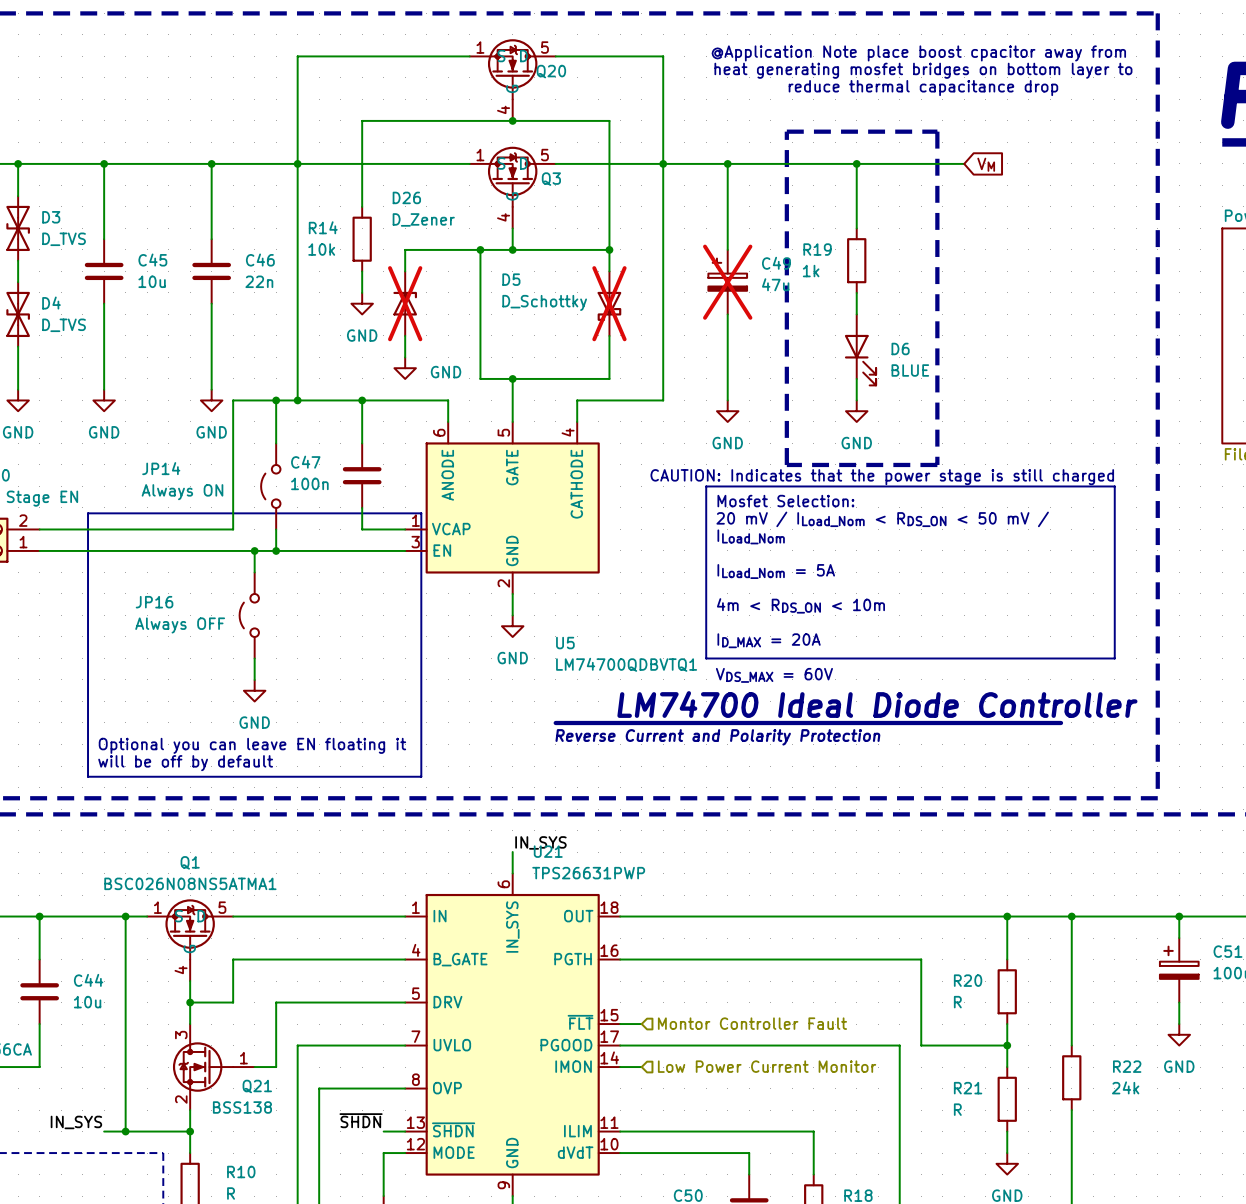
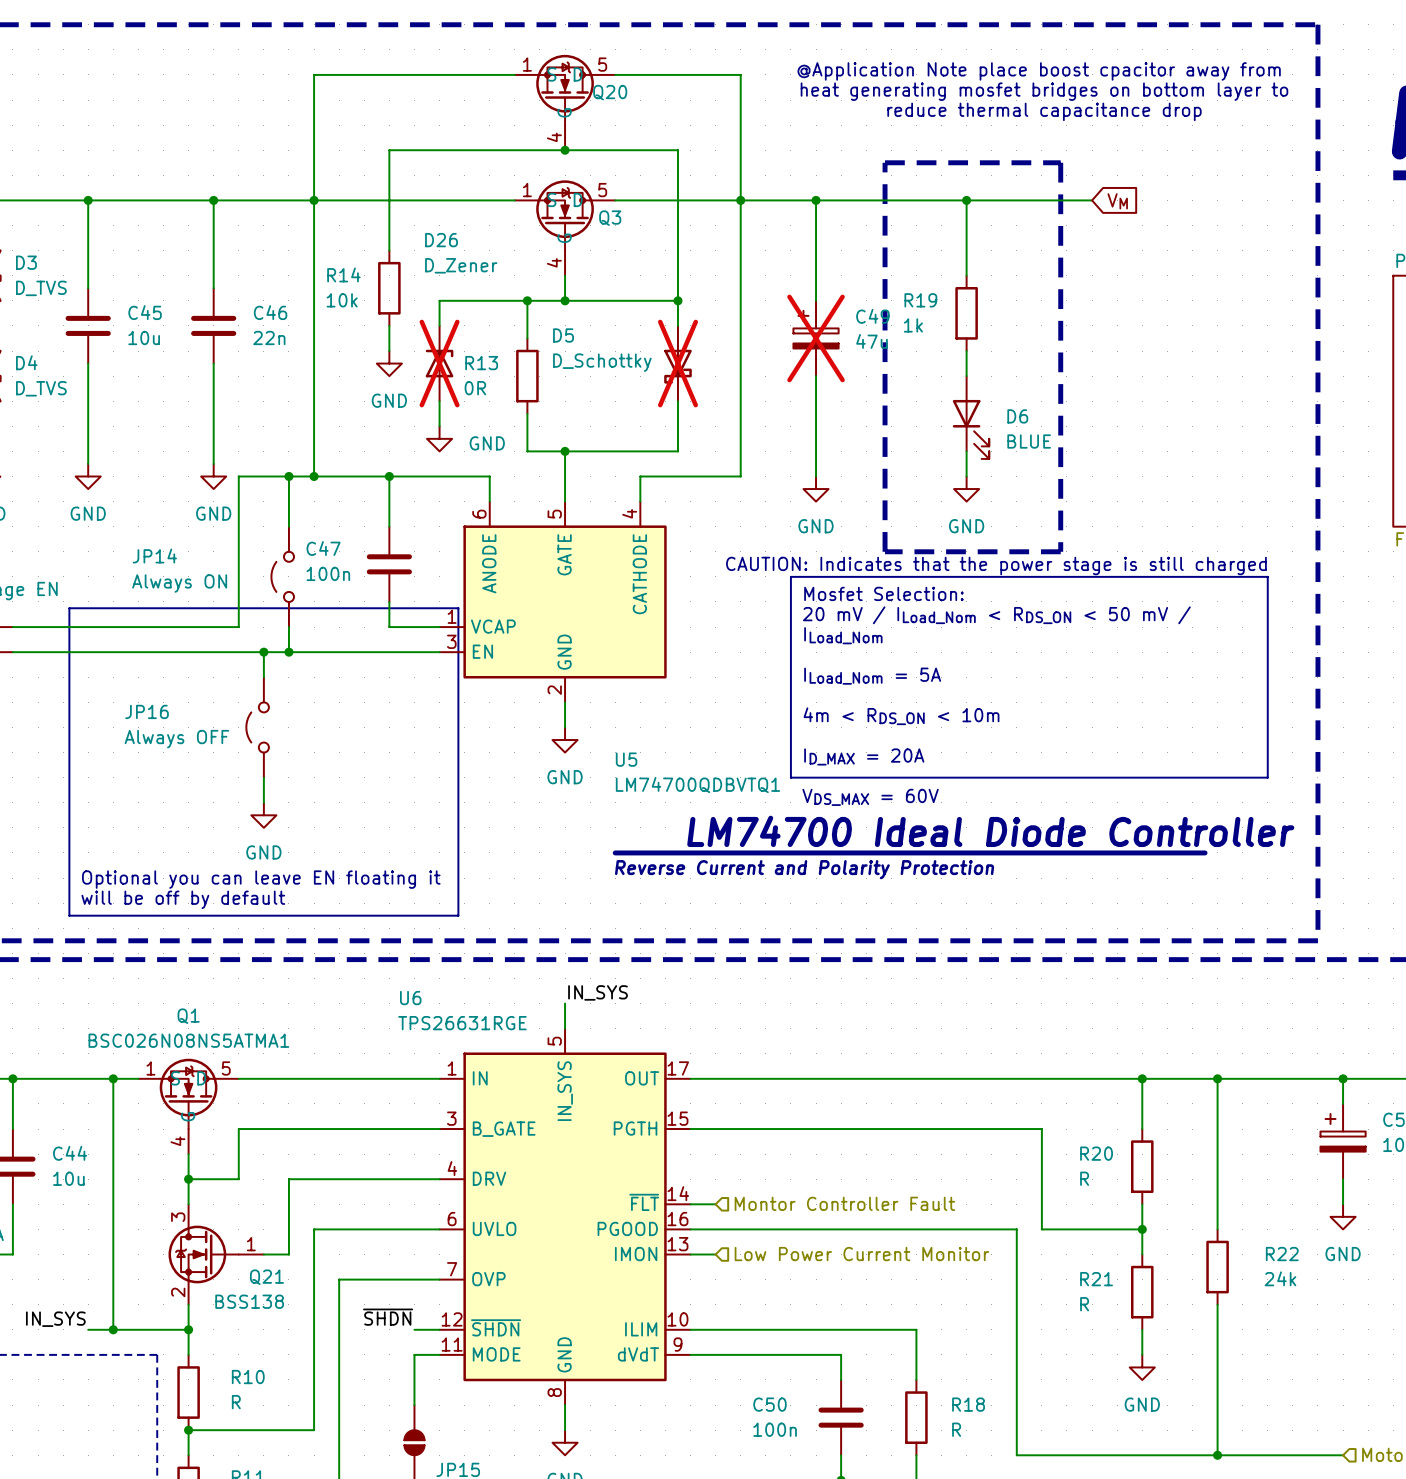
wire: (480, 282) (480, 346) -> none
R13: none -> 0R (527, 376)
U21 name: U21 (548, 851) -> U6 (410, 998)
U21 symbol: [405, 873, 621, 1197] -> [439, 1028, 691, 1406]
U21 value: TPS26631PWP (588, 873) -> TPS26631RGE (462, 1023)

